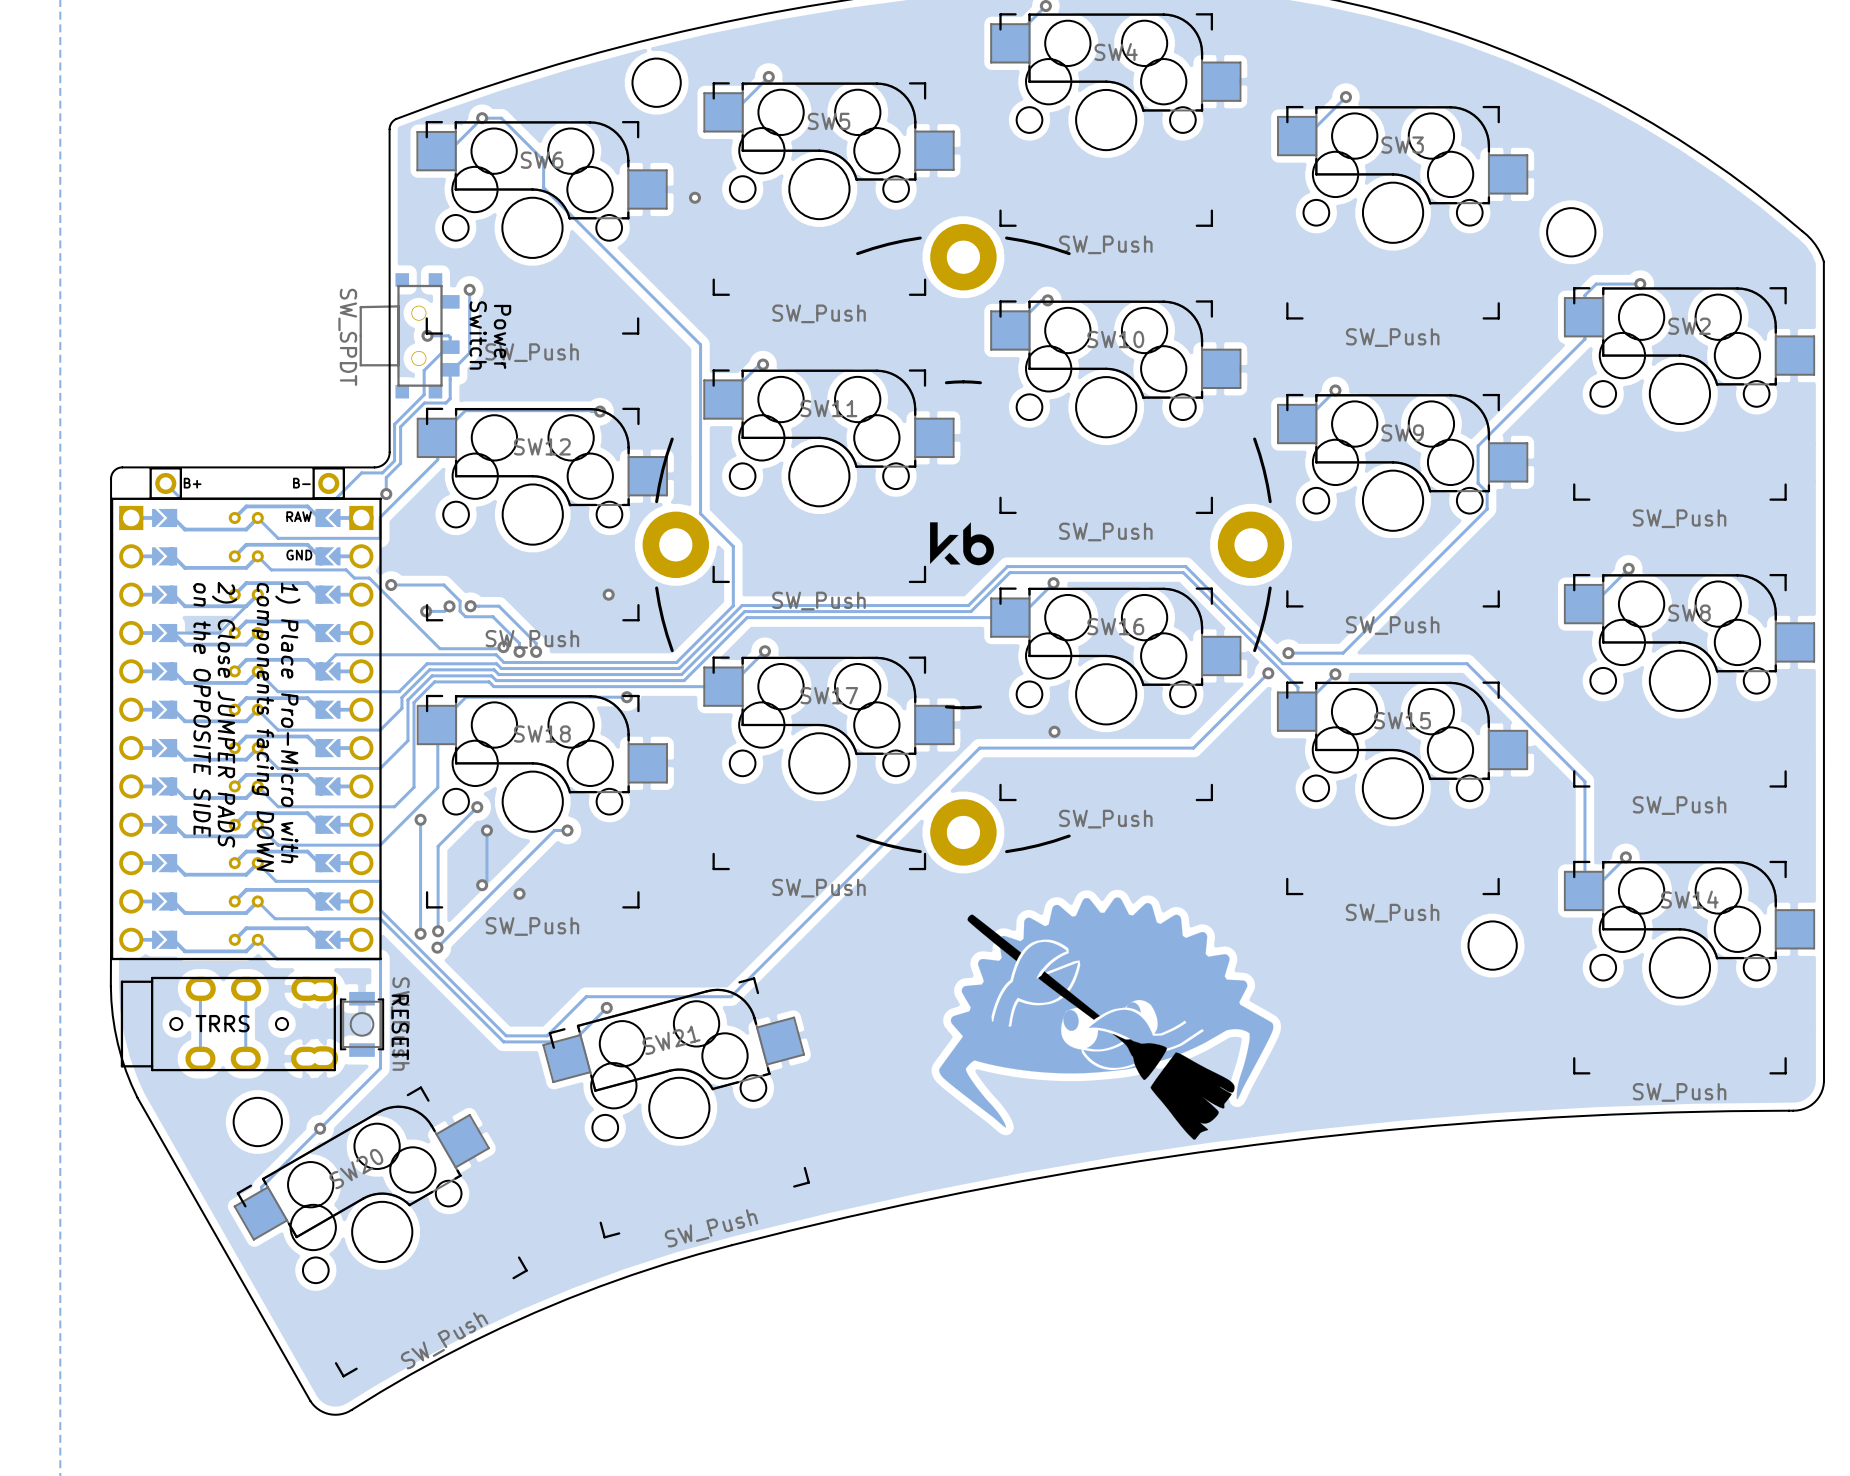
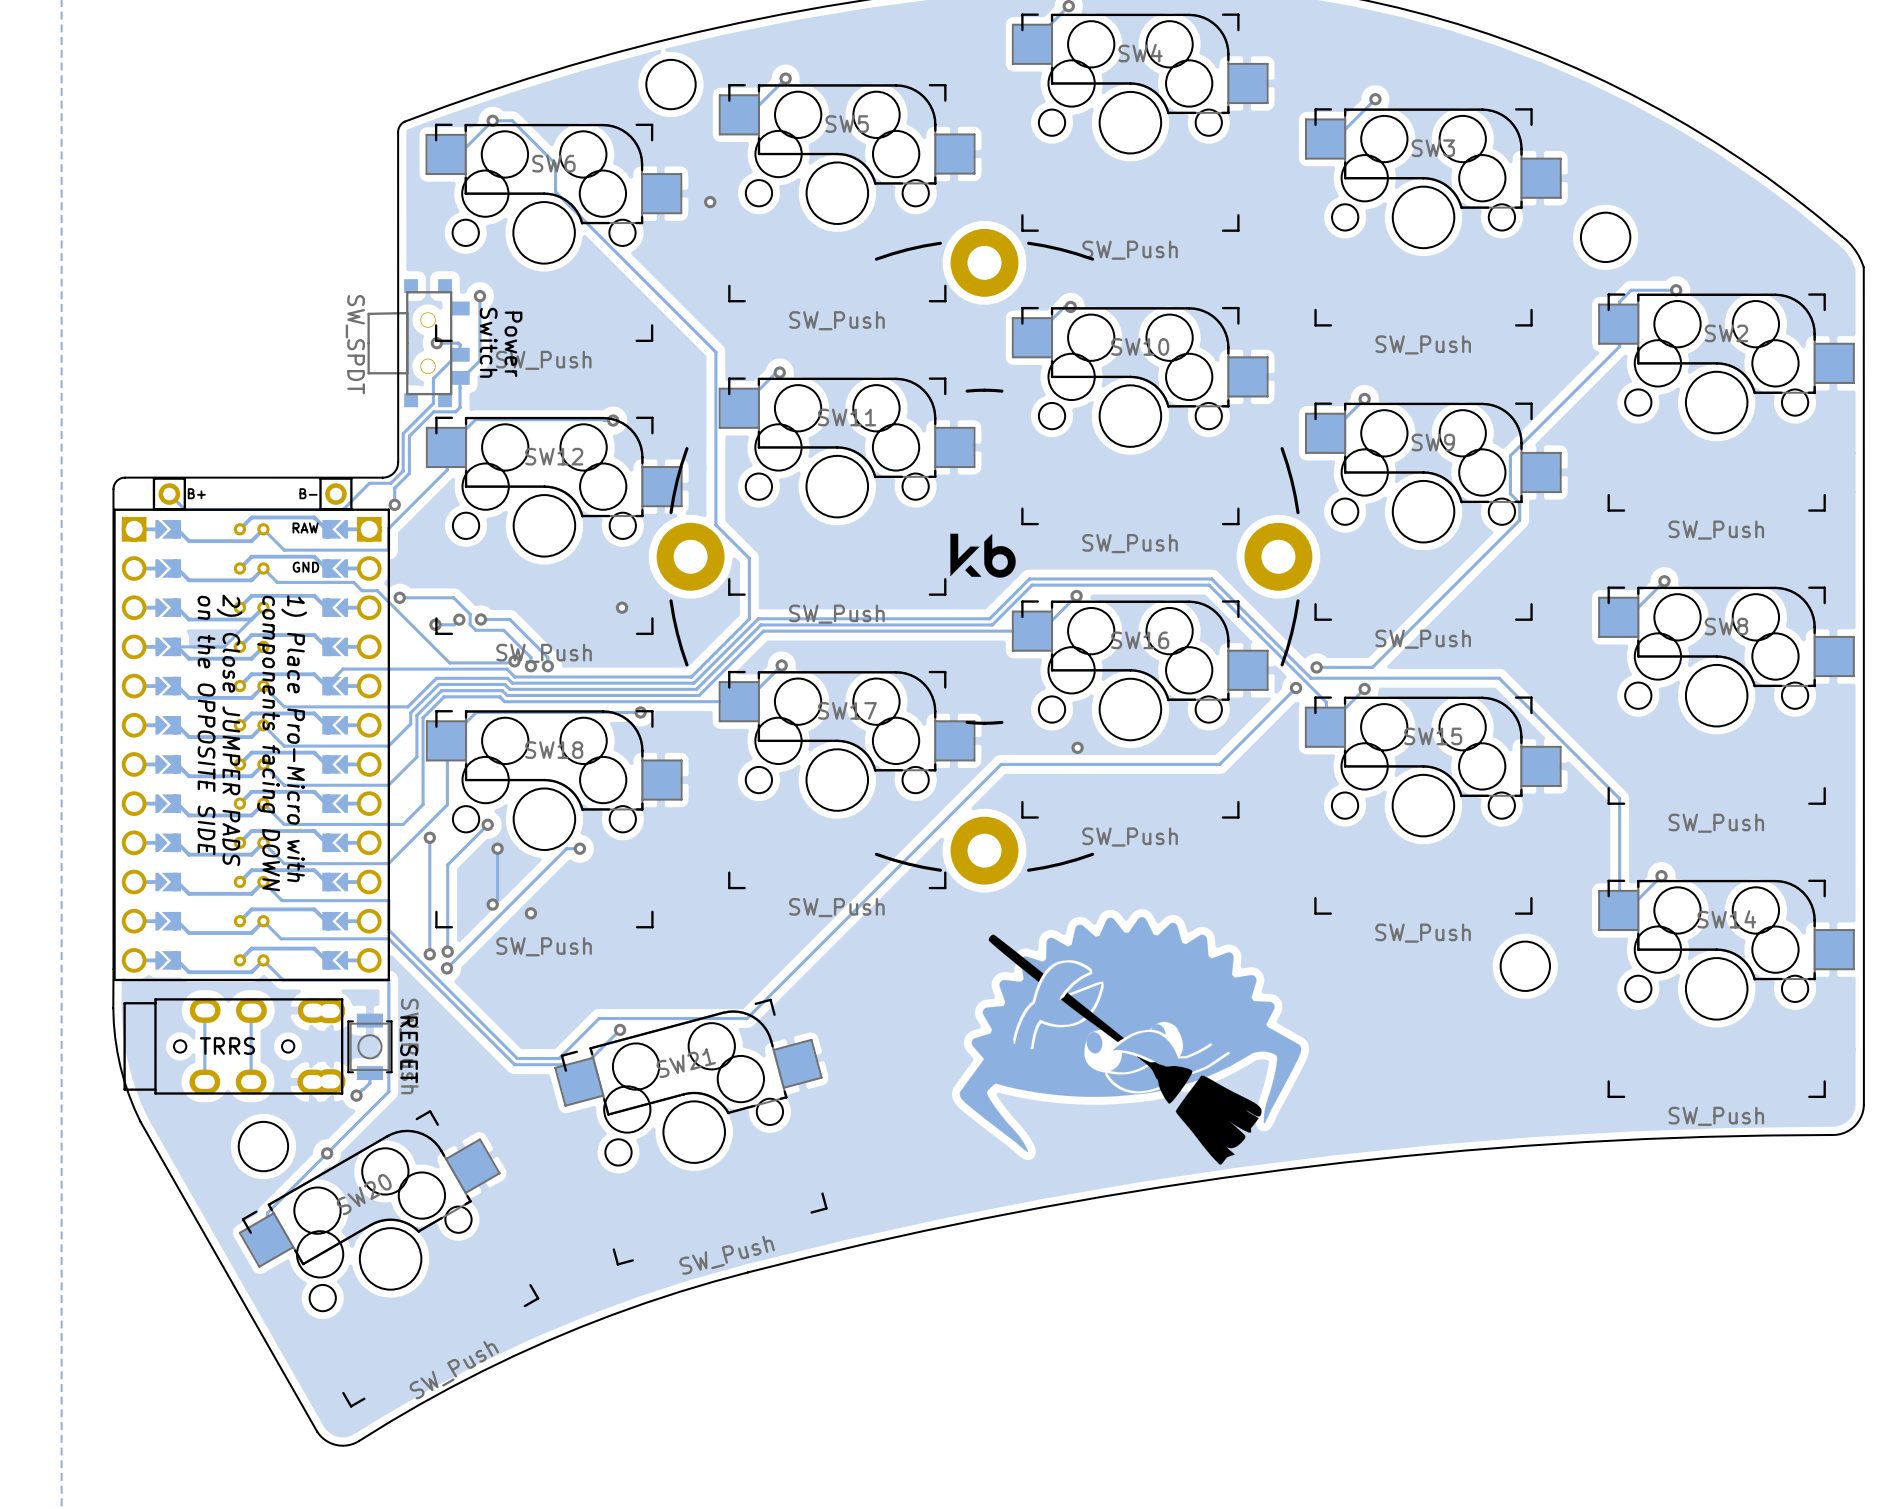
track: none -> (369, 1073) (369, 1083) (356, 1095)
via: none -> (356, 1095)

